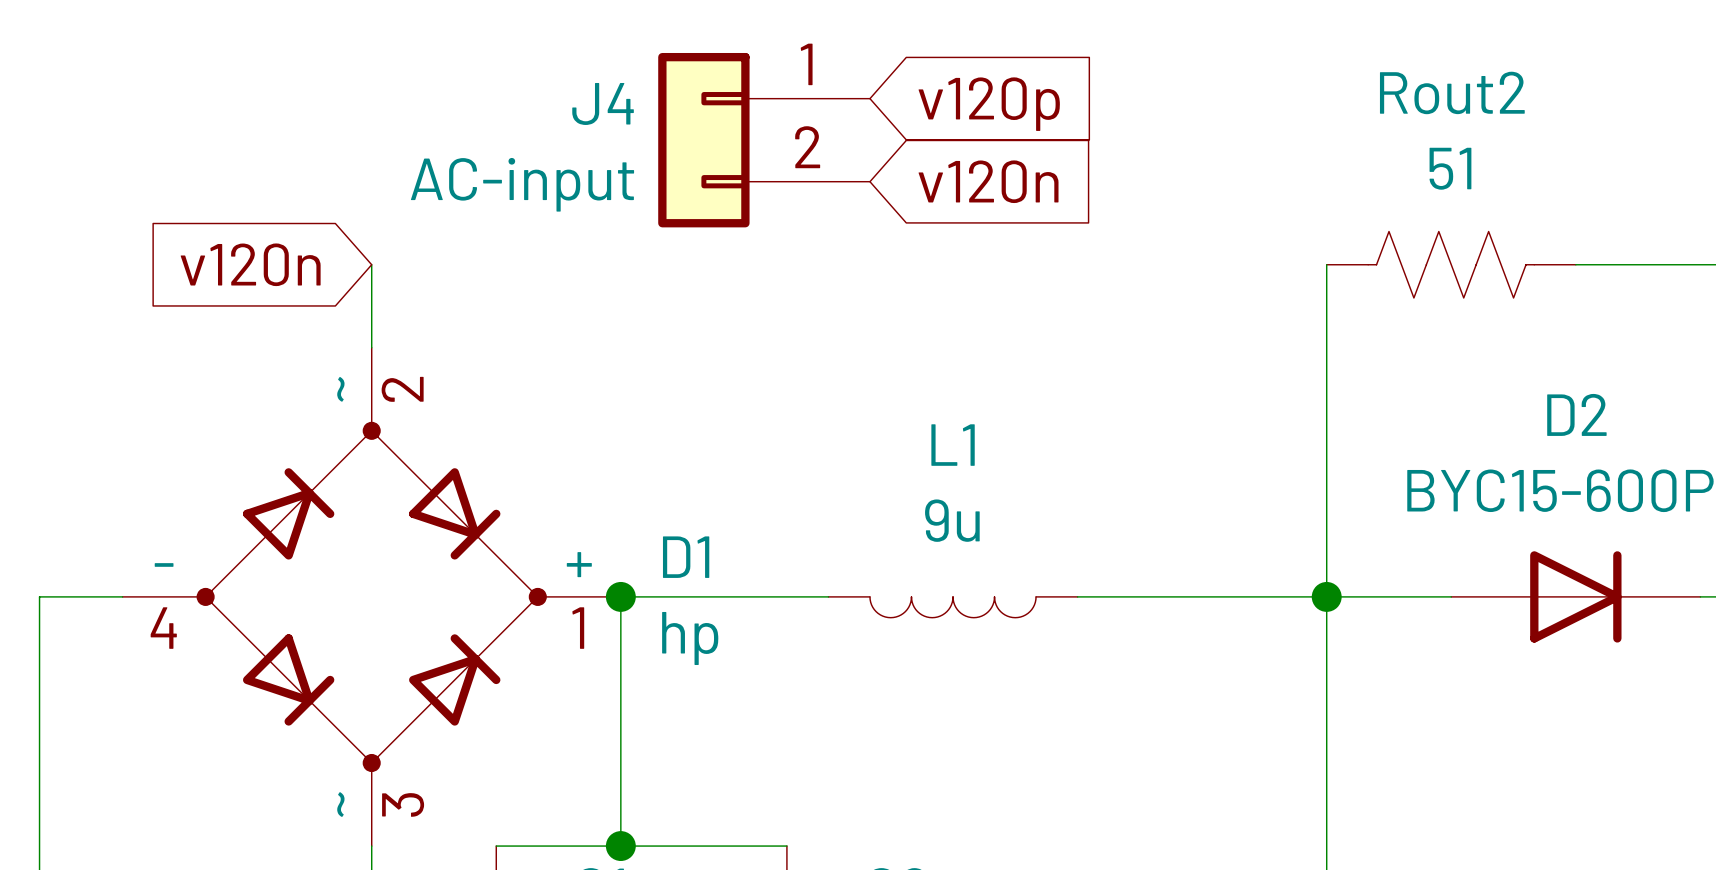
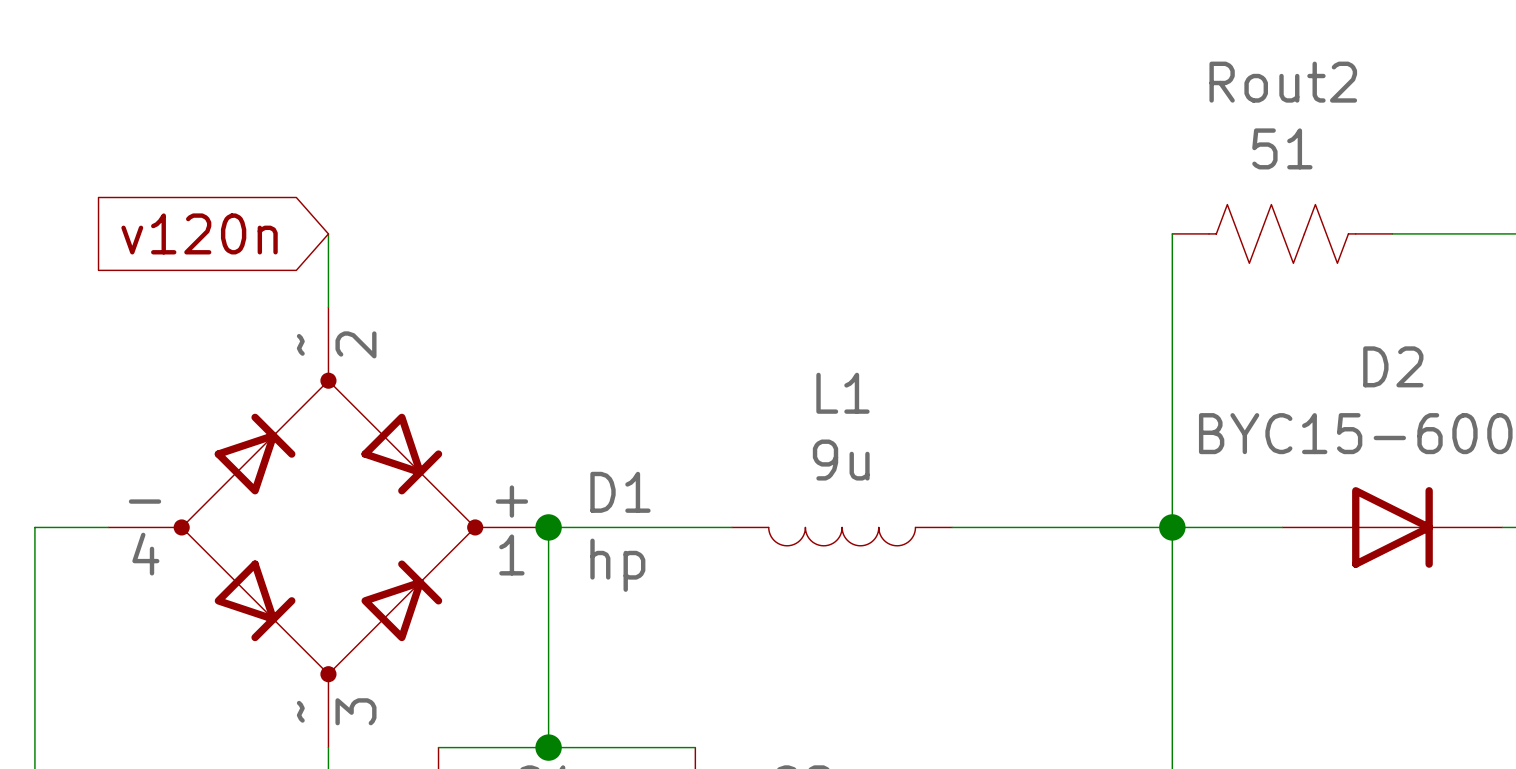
global label: v120p (989, 104) -> none
J4: AC-input (764, 140) -> none
global label: v120n (988, 181) -> none

